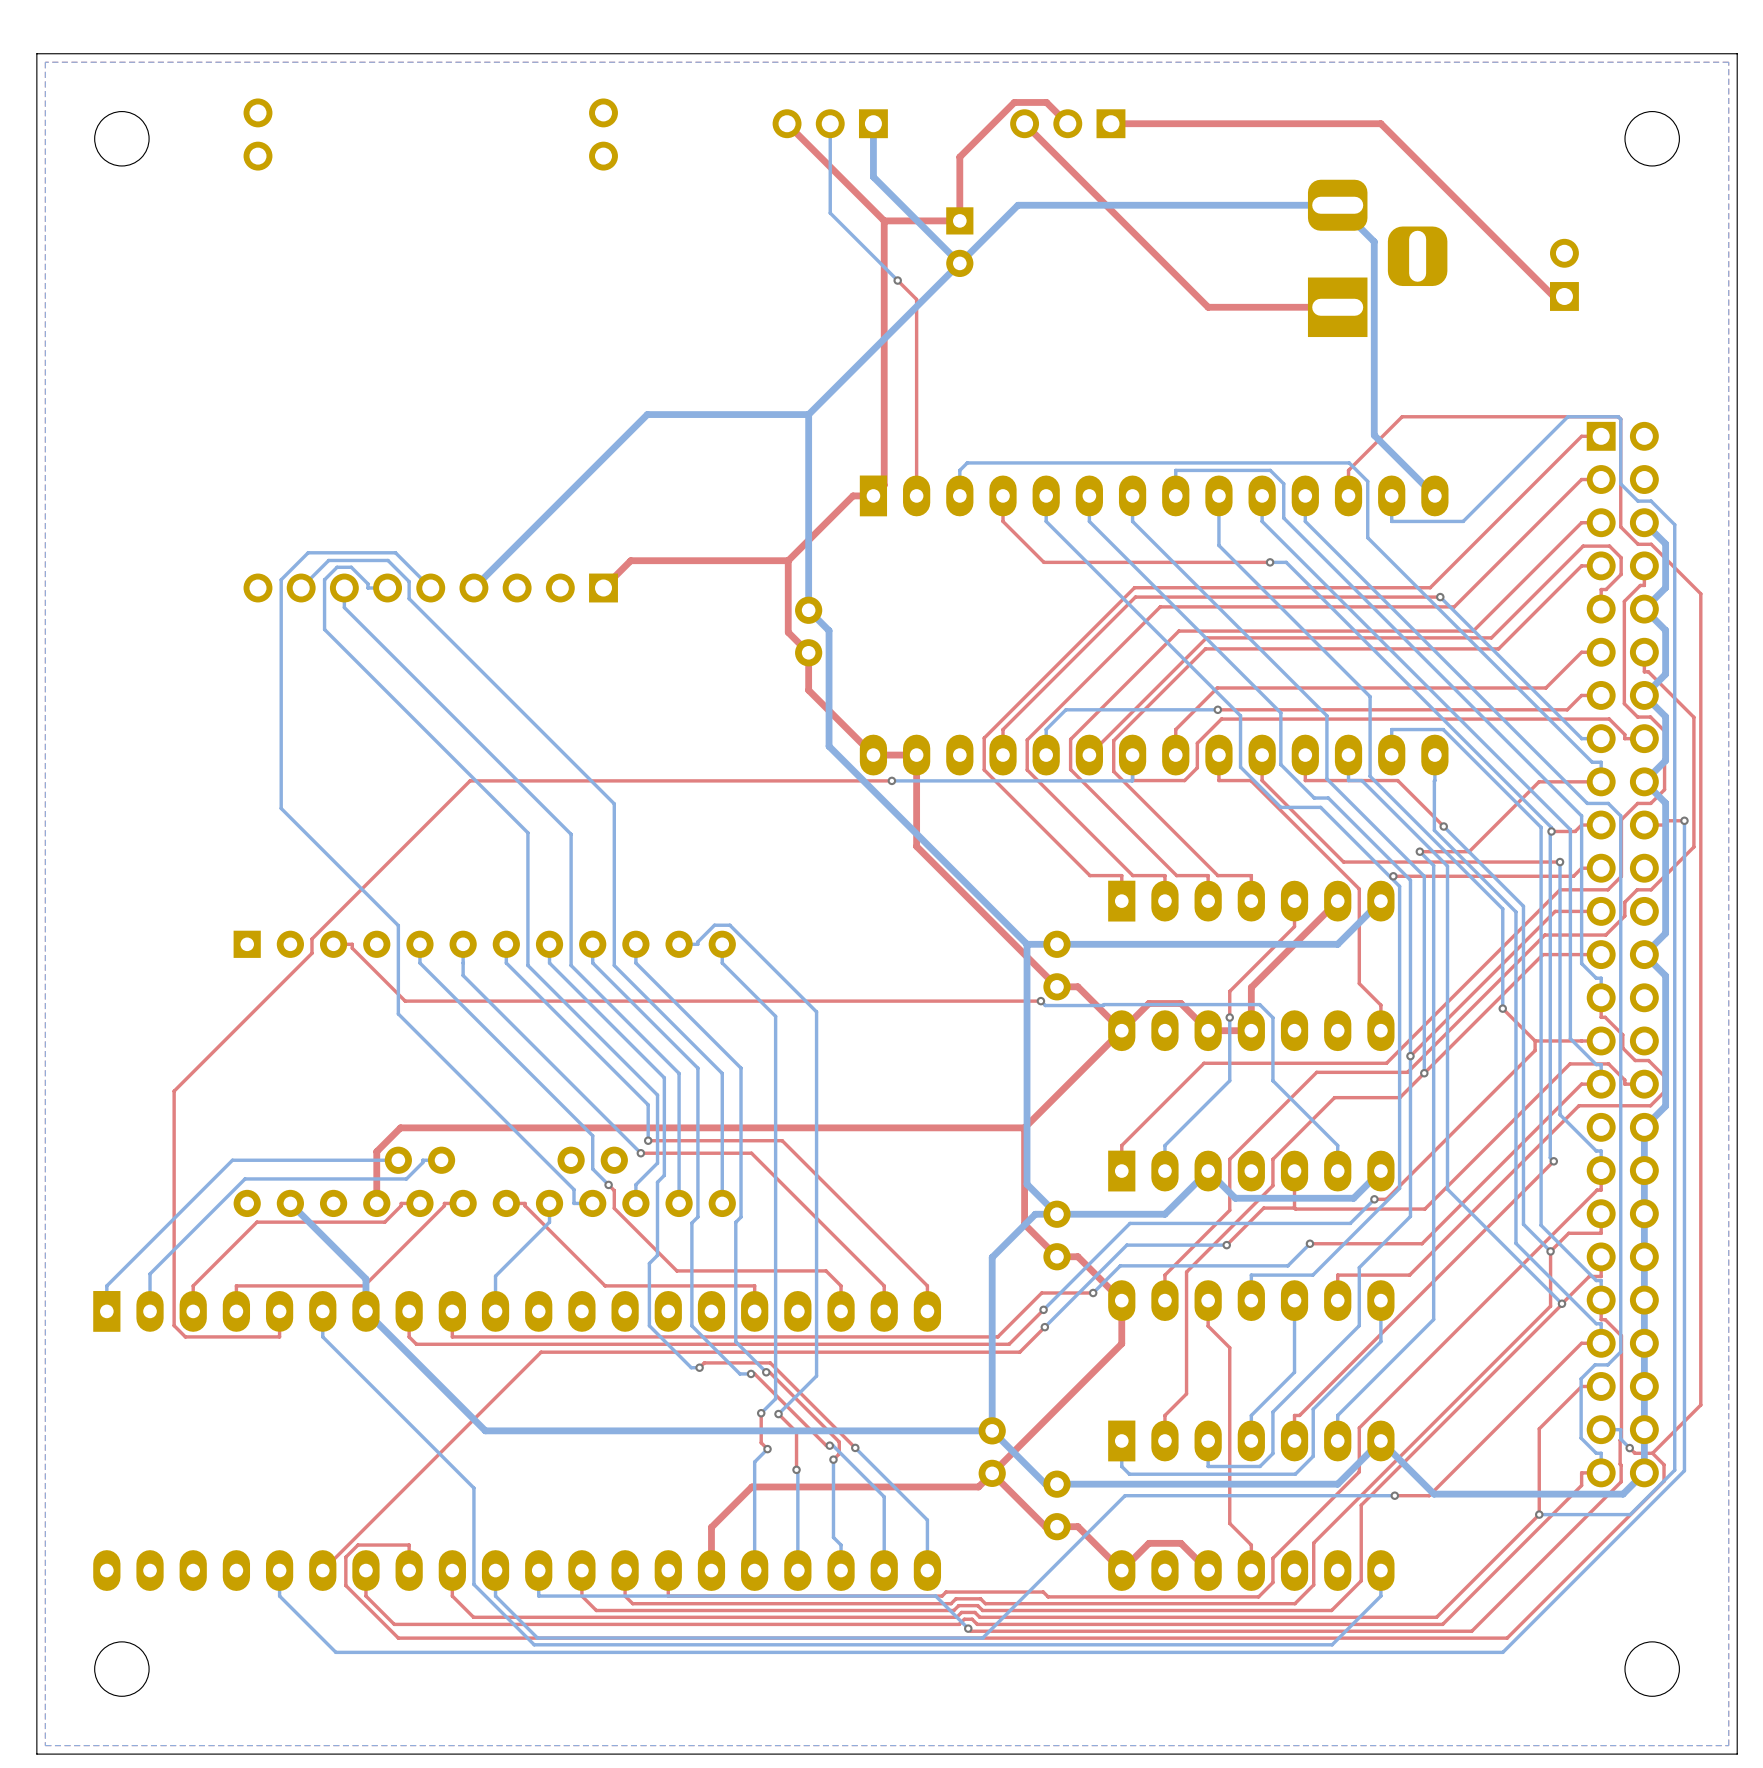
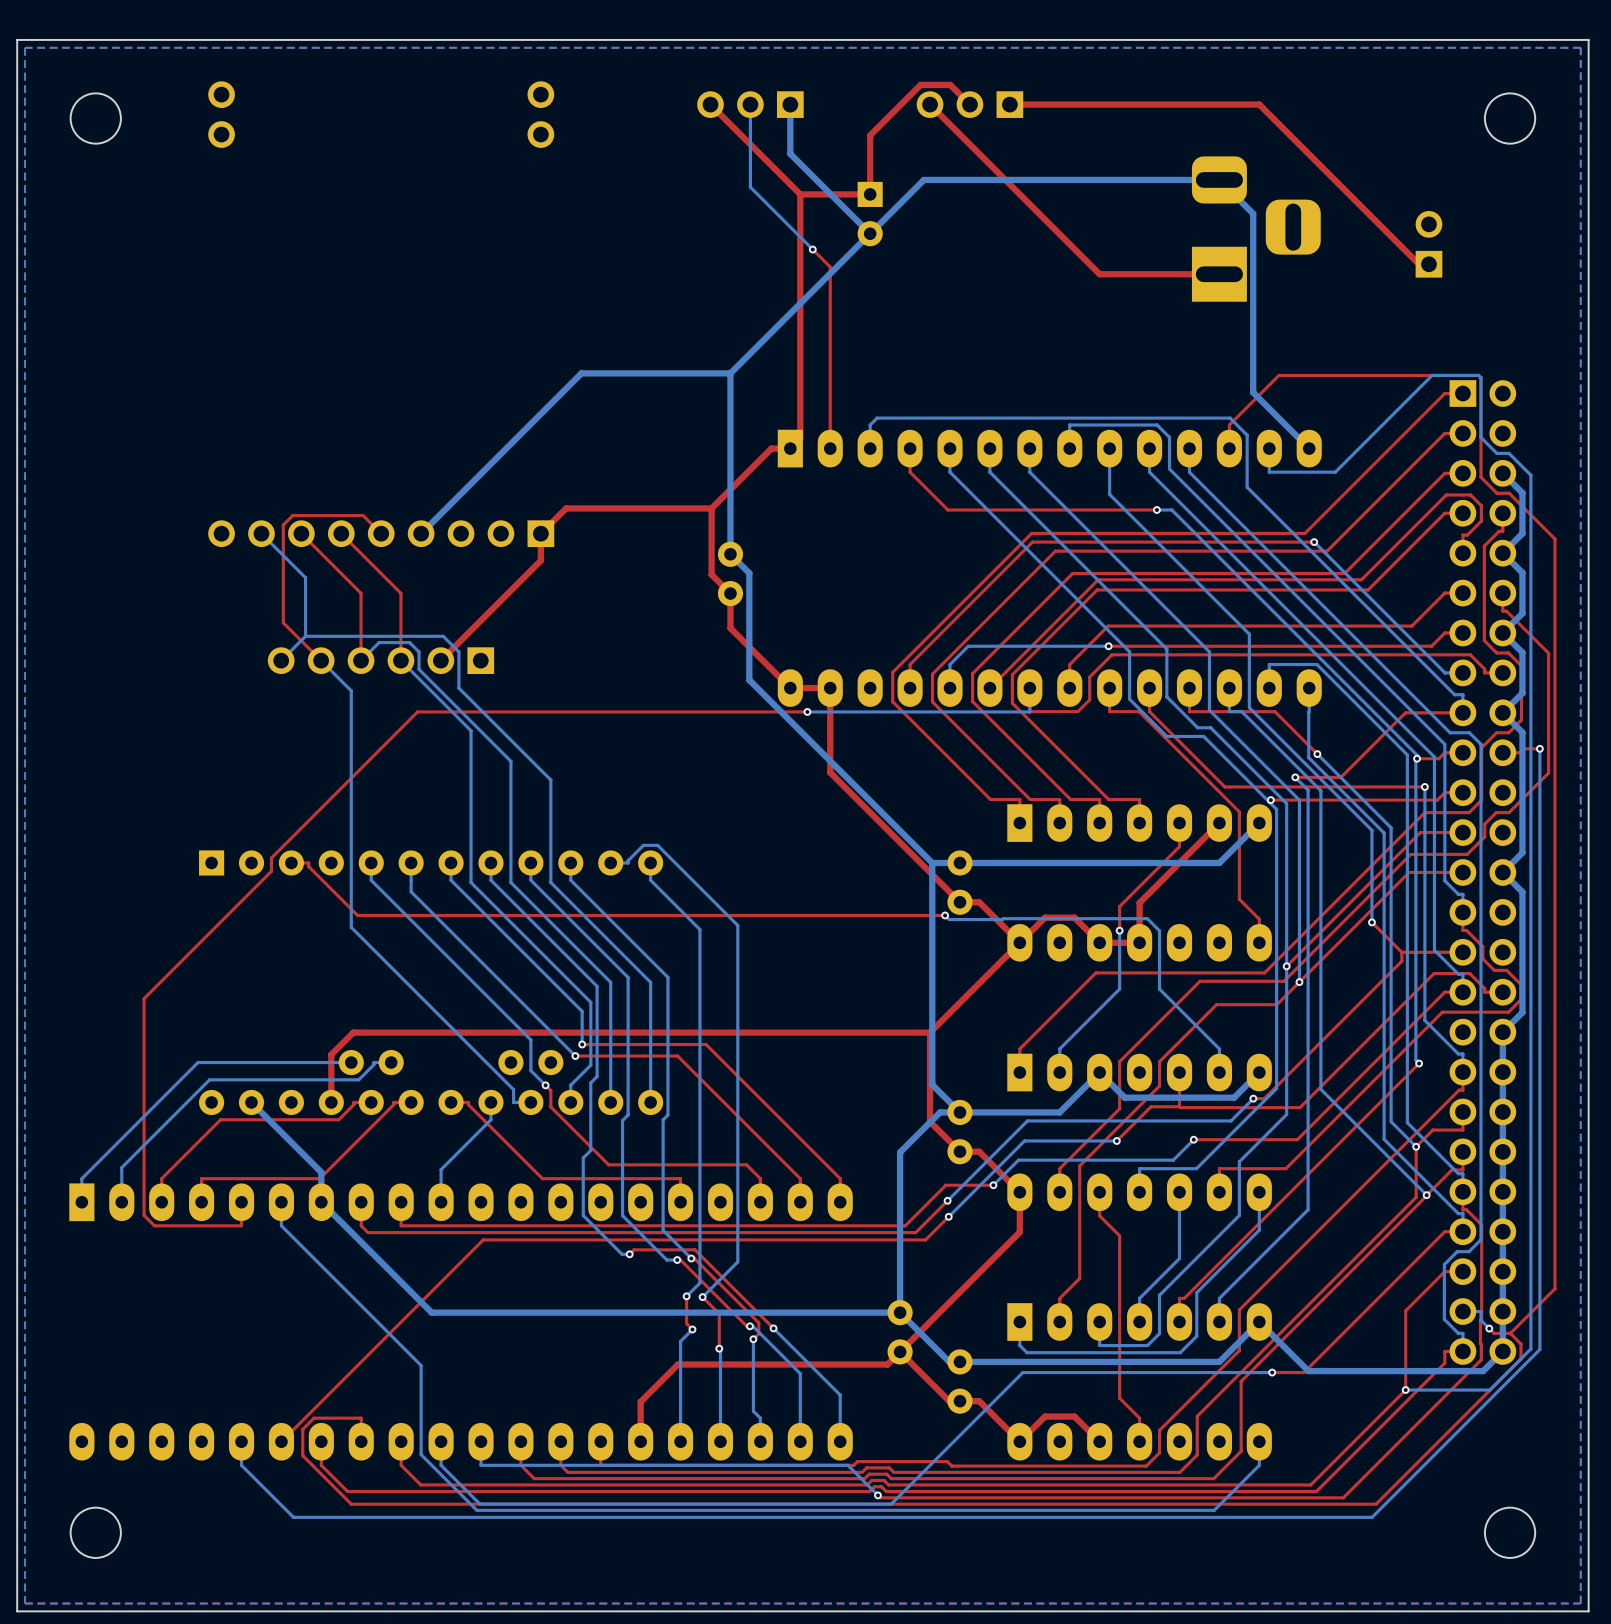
bottom track: (301, 588) (328, 560) (387, 560) (409, 581) (409, 598) (614, 803) (614, 854) -> (305, 636) (443, 636) (458, 651) (458, 688) (550, 780)
bottom track: none -> (261, 533) (305, 577) (305, 636)
top track: none -> (301, 533) (361, 593) (361, 660)
bottom track: (344, 588) (344, 607) (471, 734) -> (361, 660) (379, 642) (409, 642) (419, 651) (419, 669)
top track: none -> (341, 533) (400, 593) (400, 660)
bottom track: (387, 588) (368, 588) (368, 583) (351, 567) (337, 567) (324, 579) (324, 629) (527, 832) -> (400, 660) (471, 730) (471, 759)
top track: none -> (381, 533) (363, 515) (292, 515) (283, 525) (283, 622) (321, 660)
bottom track: (430, 588) (395, 552) (308, 552) (281, 579) (281, 808) (398, 925) -> (321, 660) (351, 690) (351, 845)
top track: none -> (540, 533) (540, 560) (440, 660)
bottom track: none -> (305, 636) (281, 660)
part: none -> (380, 660)

